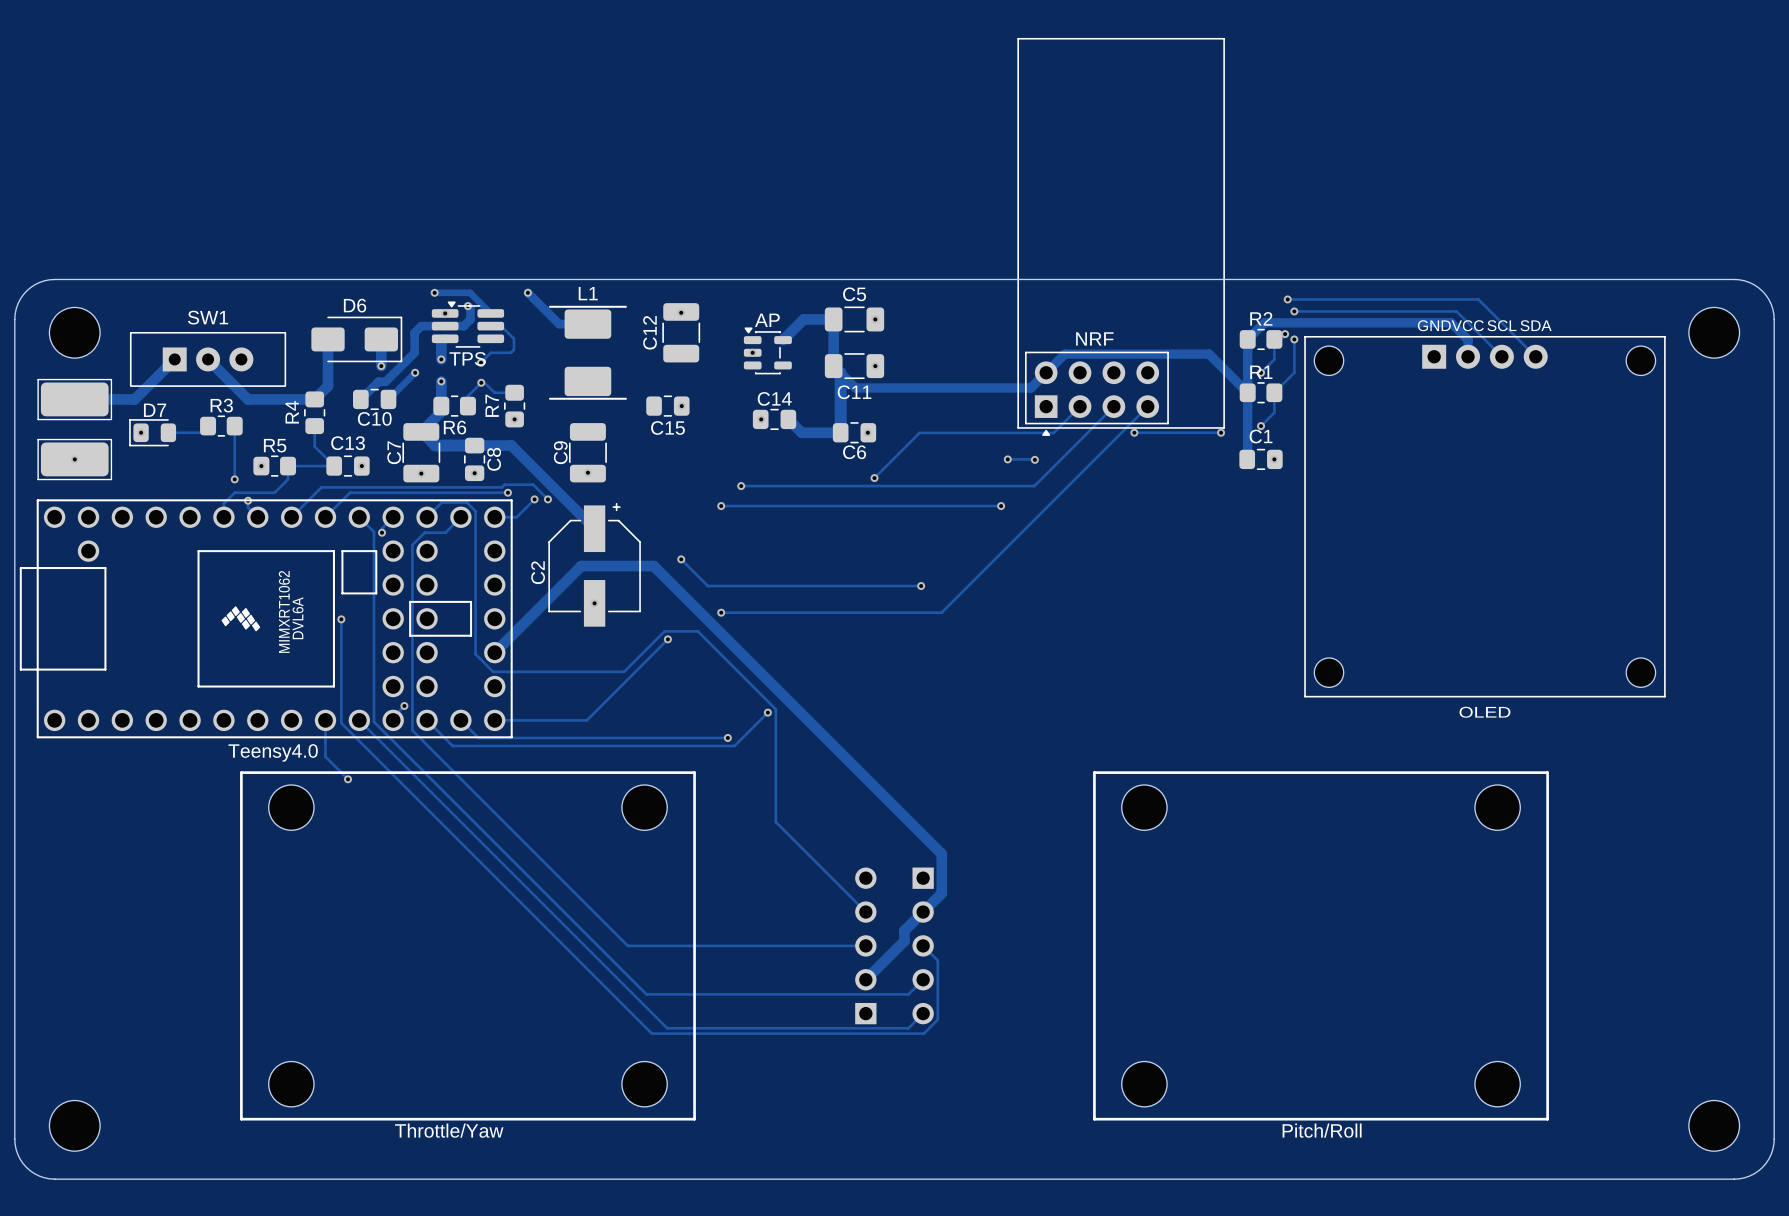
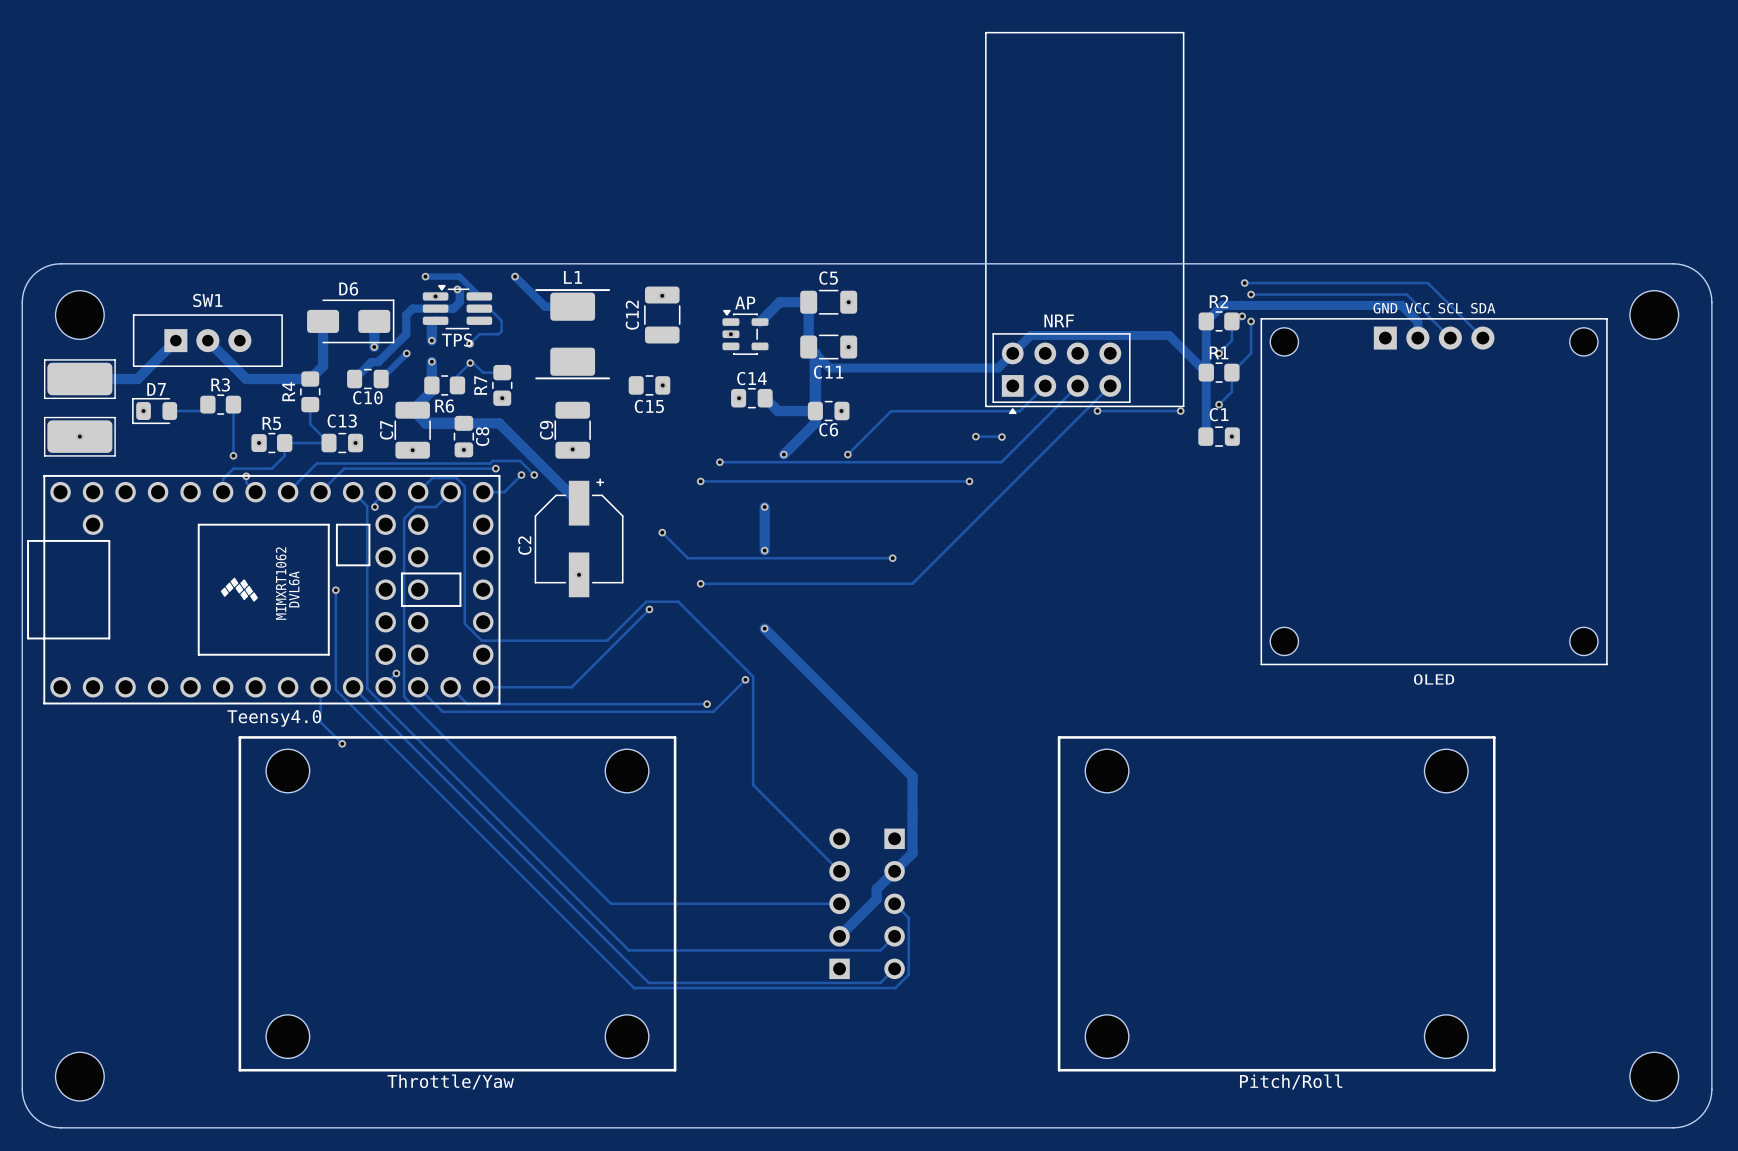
track: none -> (815, 411) (815, 423) (783, 454)
via: none -> (783, 454)
track: none -> (764, 507) (764, 550)
via: none -> (764, 507)
via: none -> (764, 550)
track: (494, 652) (581, 566) (653, 566) (941, 854) -> (764, 628) (912, 776) (912, 815)
via: none -> (764, 628)

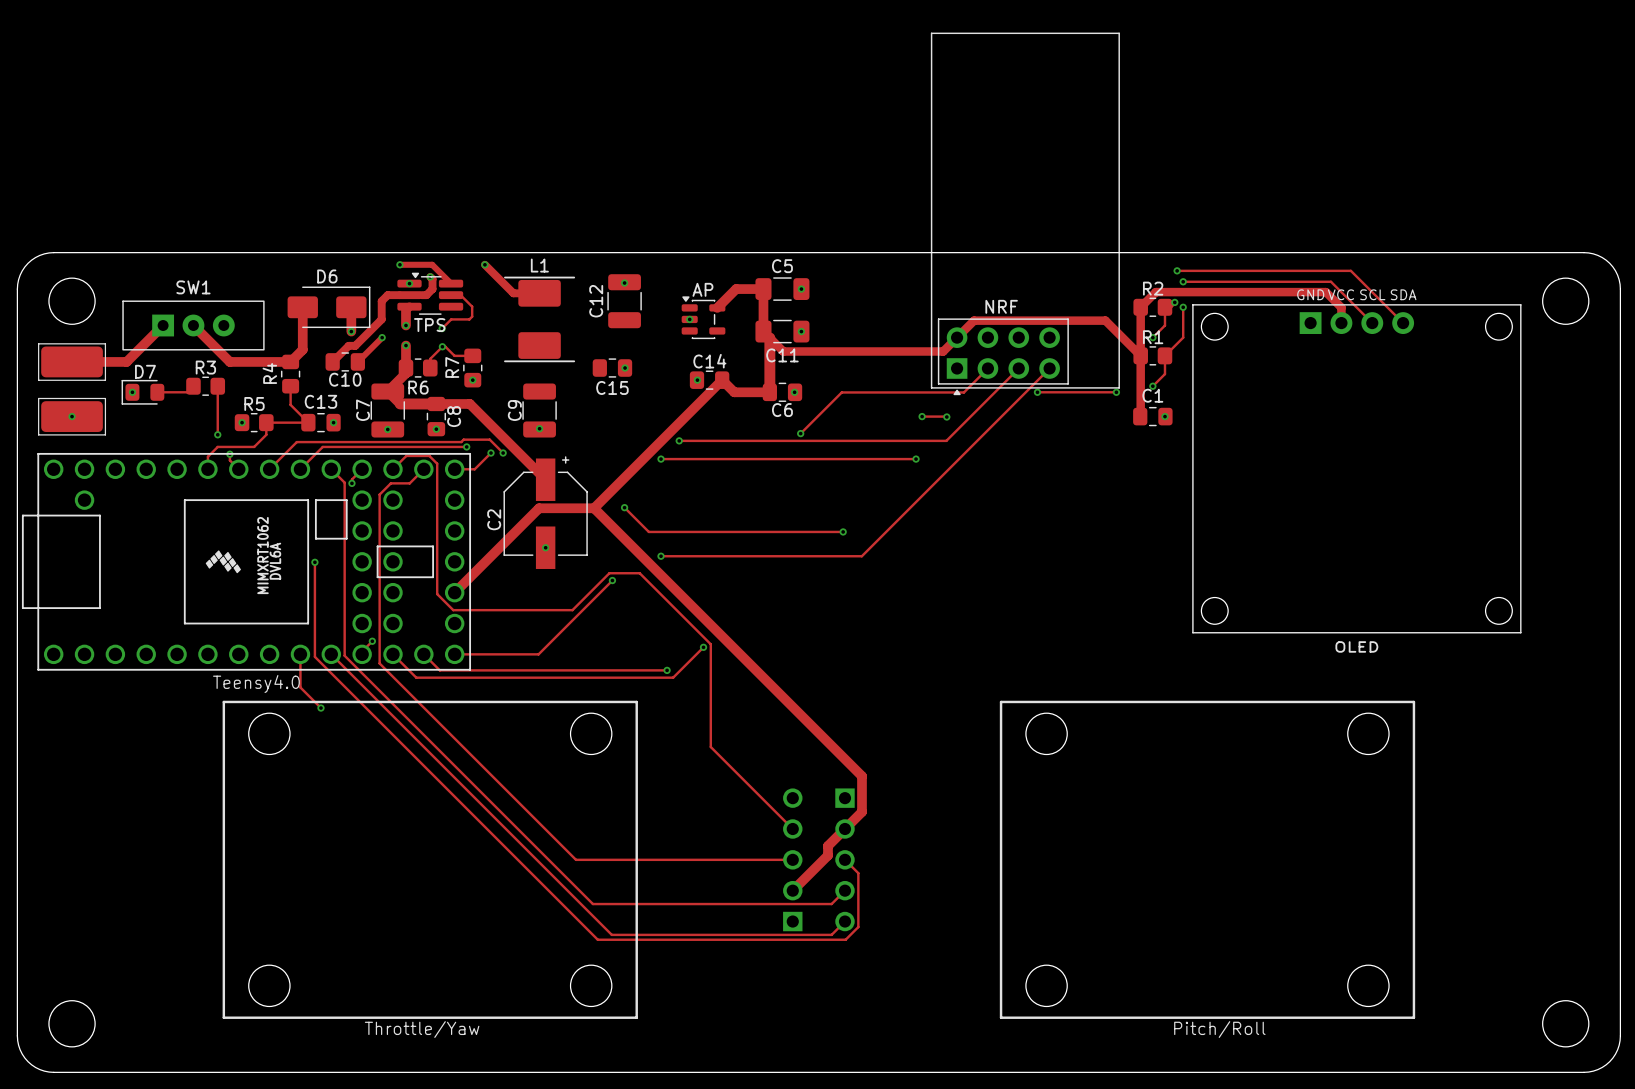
track: none -> (722, 380) (594, 508)
track: (815, 411) (815, 423) (783, 454) -> none
via: (783, 454) -> none
track: (764, 507) (764, 550) -> none
via: (764, 507) -> none
track: none -> (594, 508) (539, 508) (454, 592)
via: (764, 550) -> none
track: (764, 628) (912, 776) (912, 815) -> (594, 508) (861, 776)
via: (764, 628) -> none

